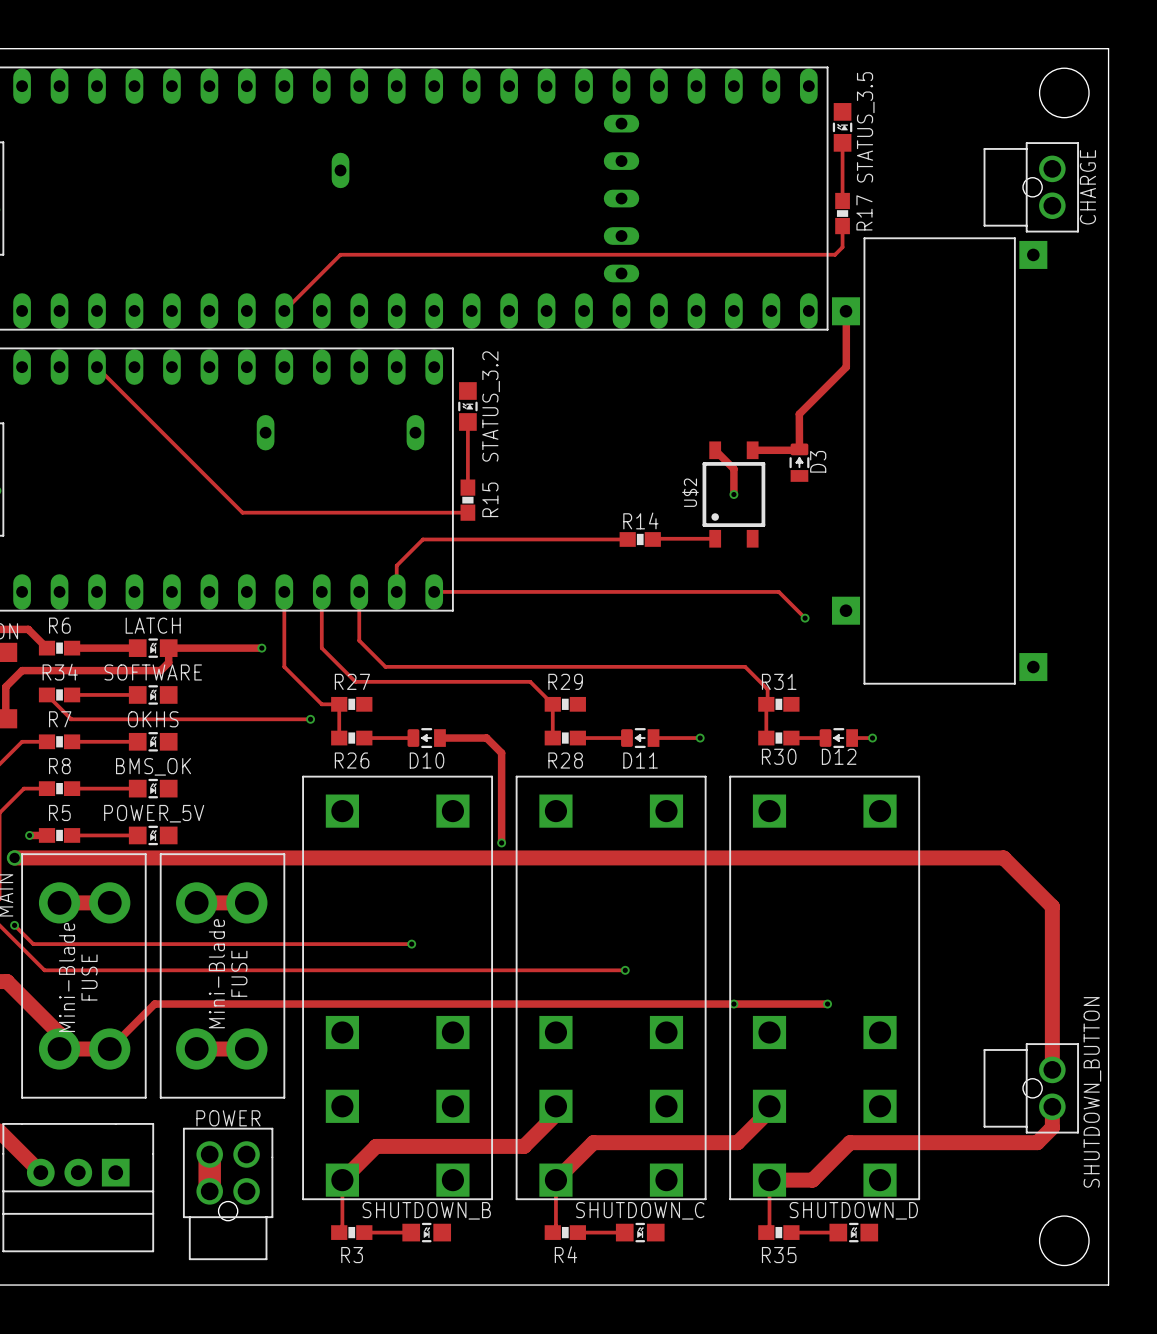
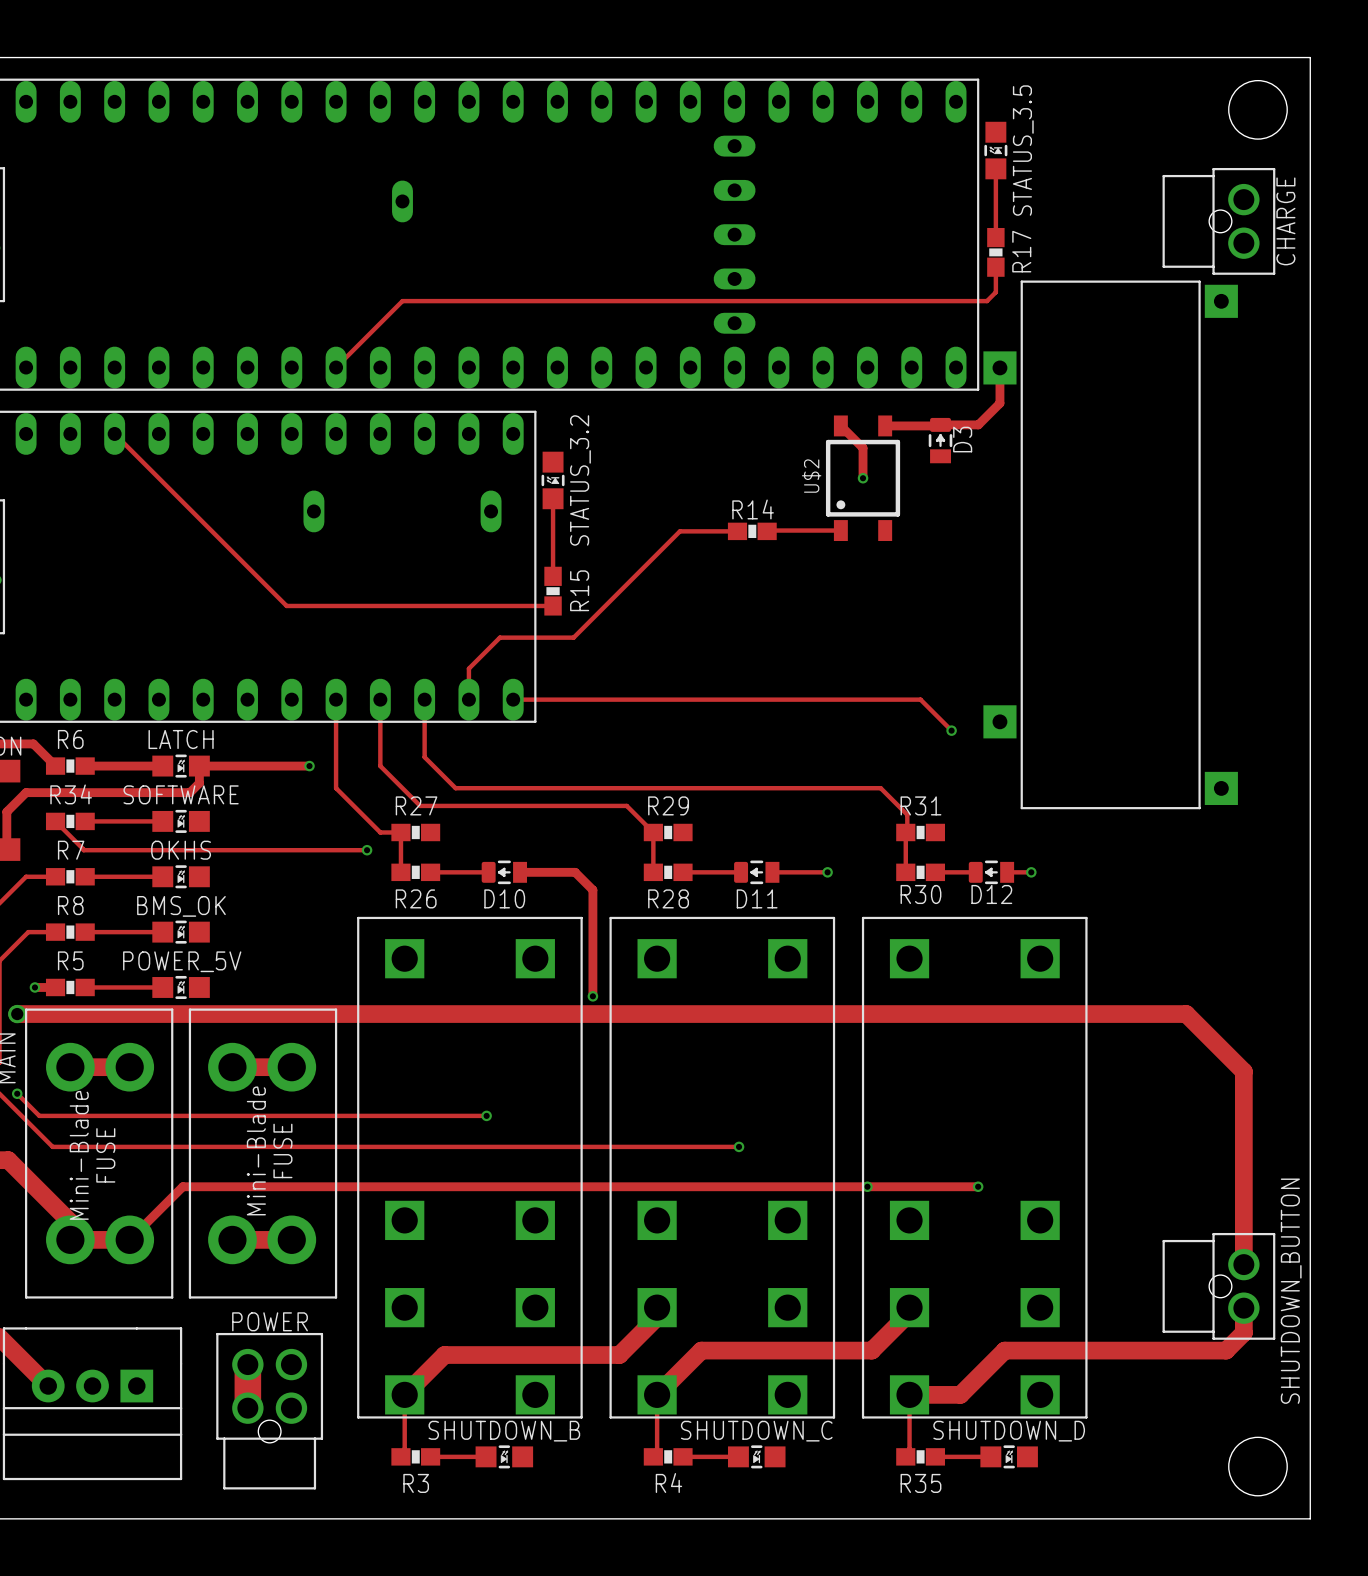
track: (846, 311) (846, 367) (799, 414) (799, 450) (752, 450) -> (999, 367) (999, 403) (978, 424) (885, 425)
via: none -> (863, 478)
track: (715, 450) (733, 469) (733, 494) -> (840, 425) (863, 448) (863, 478)
D3 position: (799, 462) -> (940, 440)
U$2 position: (733, 494) -> (863, 478)
via: (733, 494) -> none
track: (715, 538) (652, 539) -> (840, 530) (767, 531)
track: (485, 539) (627, 539) -> (573, 637) (679, 531) (737, 531)
R14 position: (640, 539) -> (752, 531)

